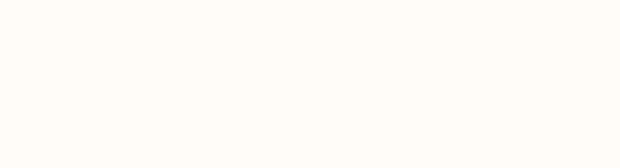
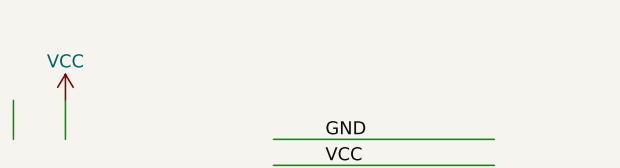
power symbol: none -> VCC (65, 87)
wire: none -> (13, 100) (13, 139)
wire: none -> (65, 100) (65, 139)
label: none -> GND (345, 127)
wire: none -> (273, 139) (494, 139)
label: none -> VCC (343, 153)
wire: none -> (273, 165) (494, 165)

